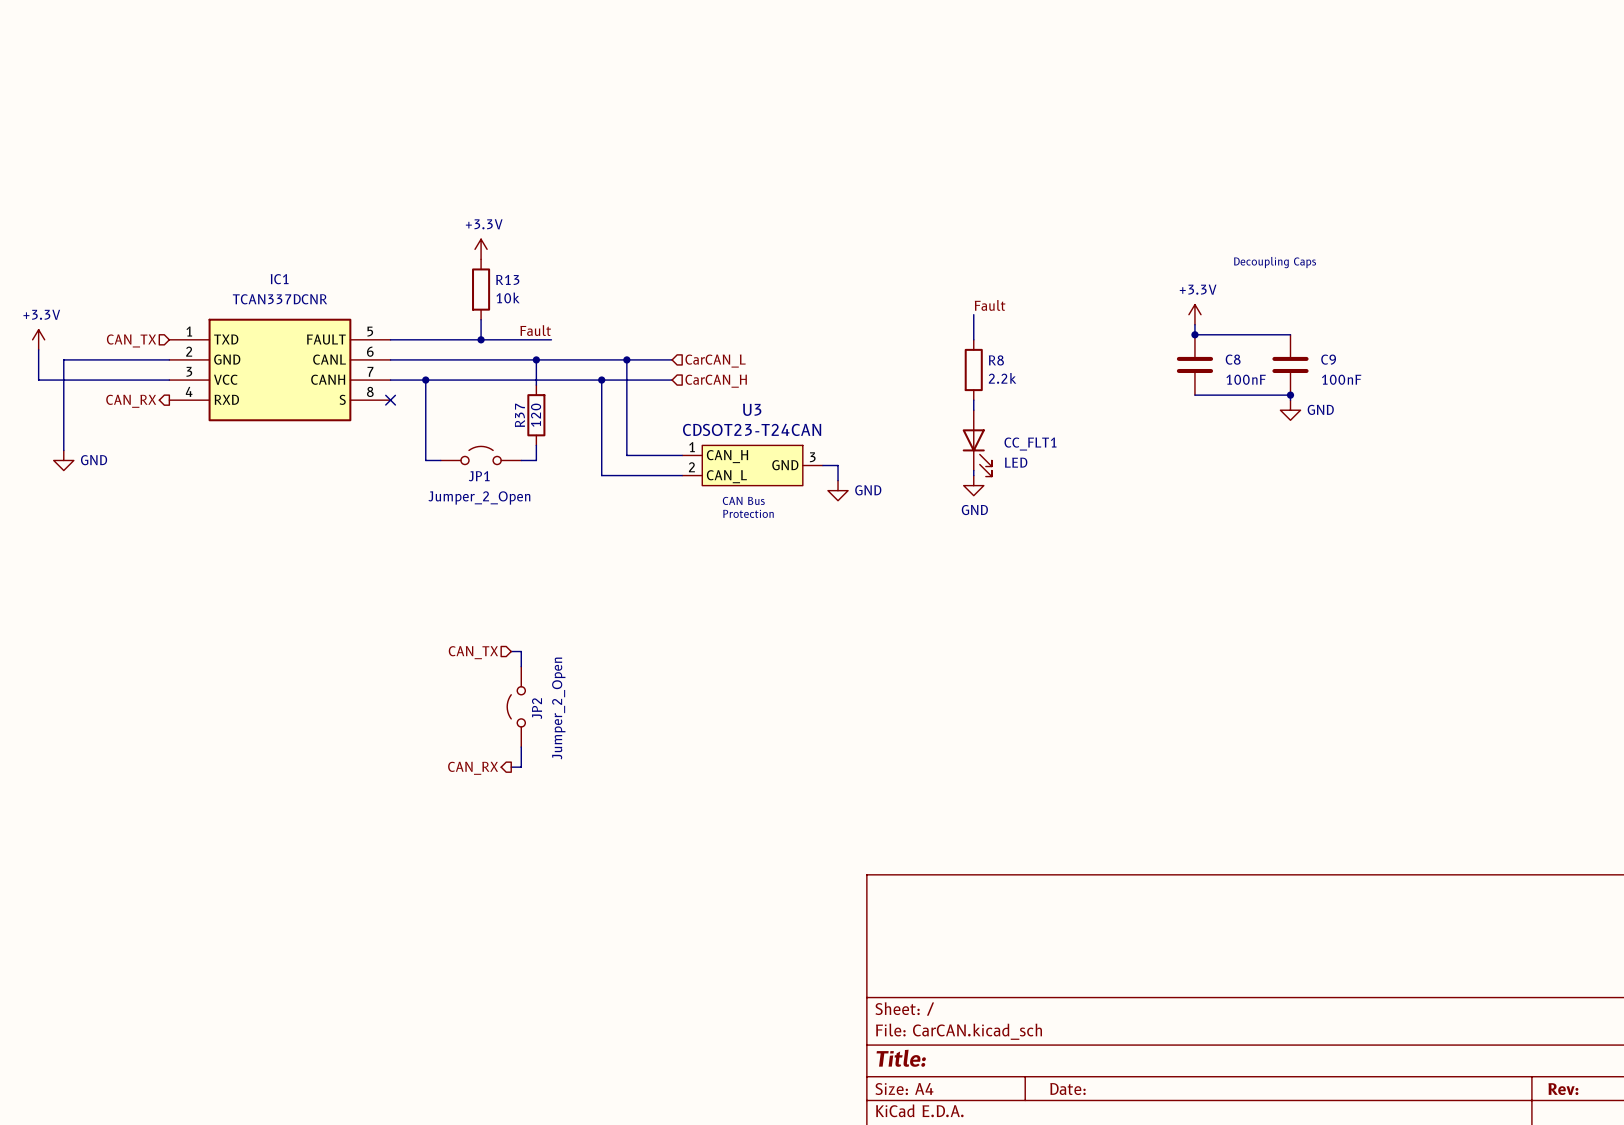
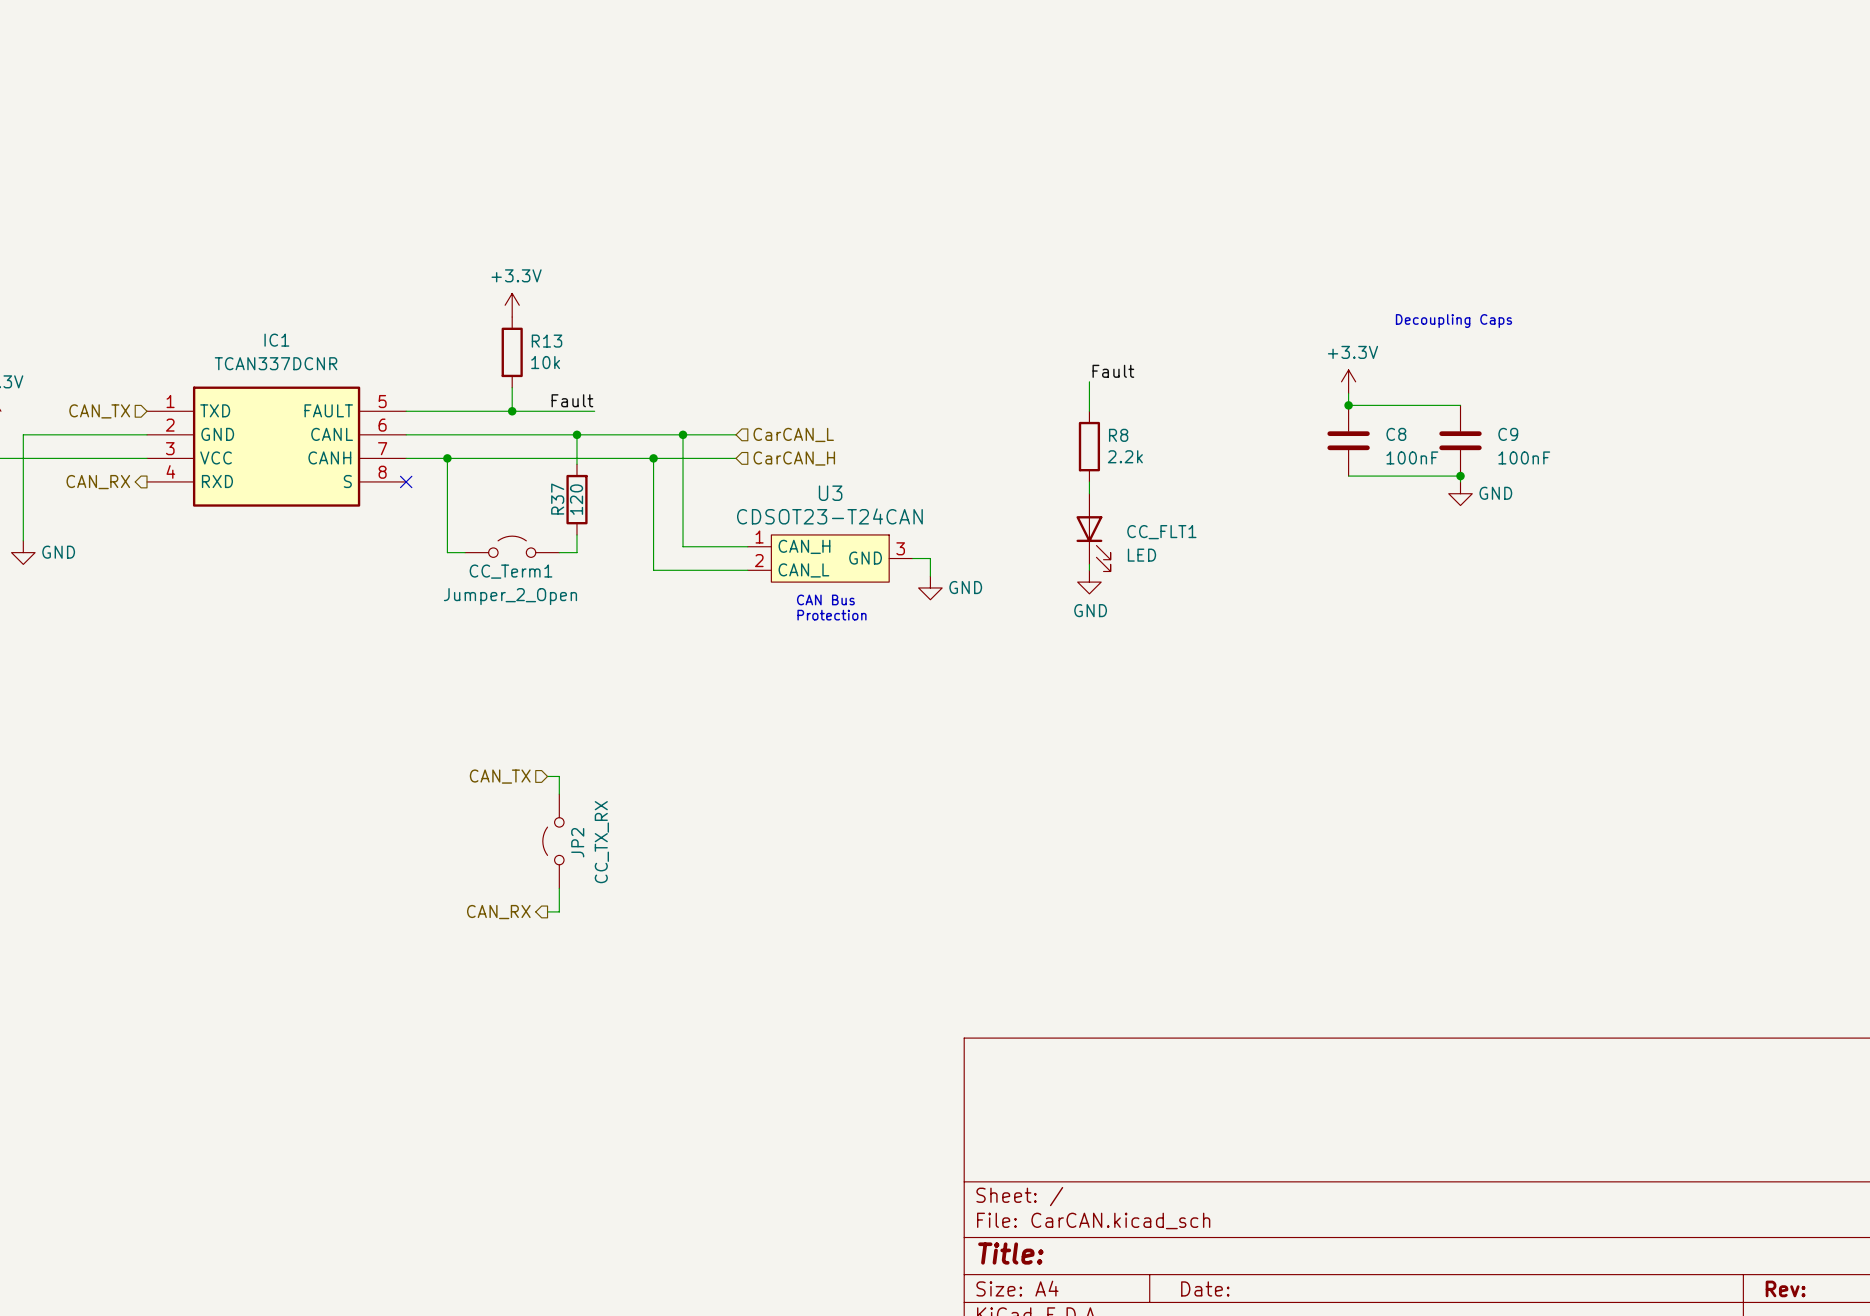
JP1 name: JP1 (479, 476) -> CC_Term1 (511, 571)
JP2 value: Jumper_2_Open (558, 708) -> CC_TX_RX (601, 842)

